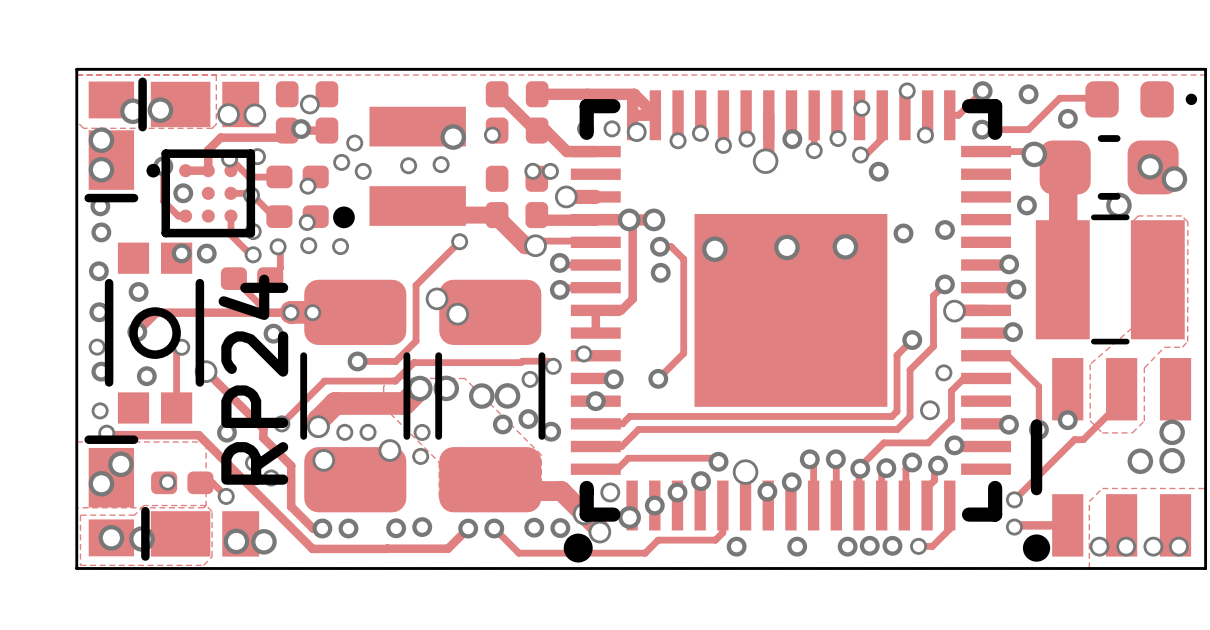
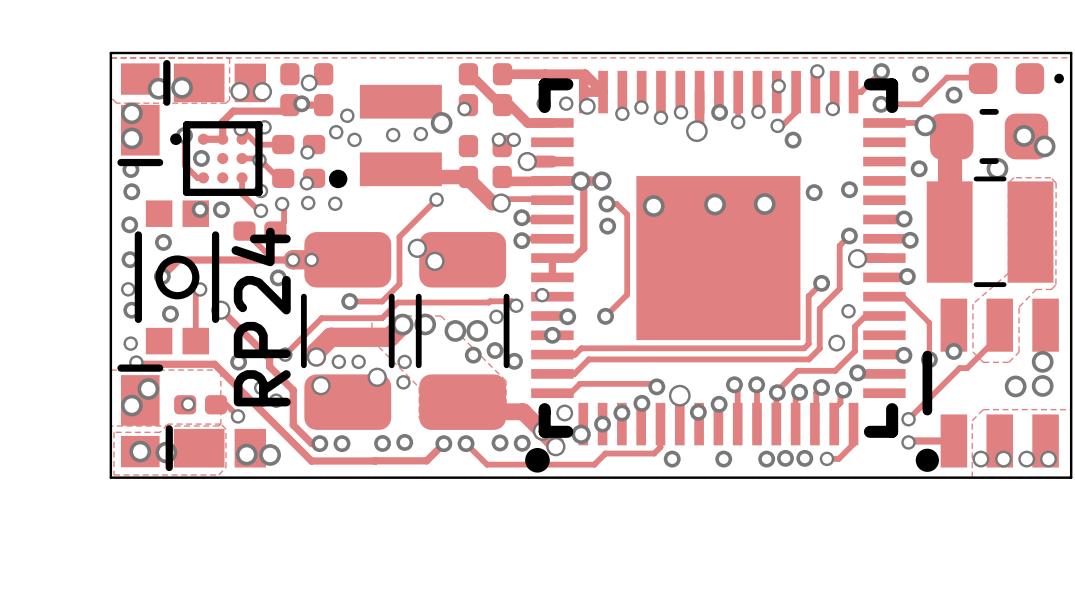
via position: (453, 137) -> (441, 122)

